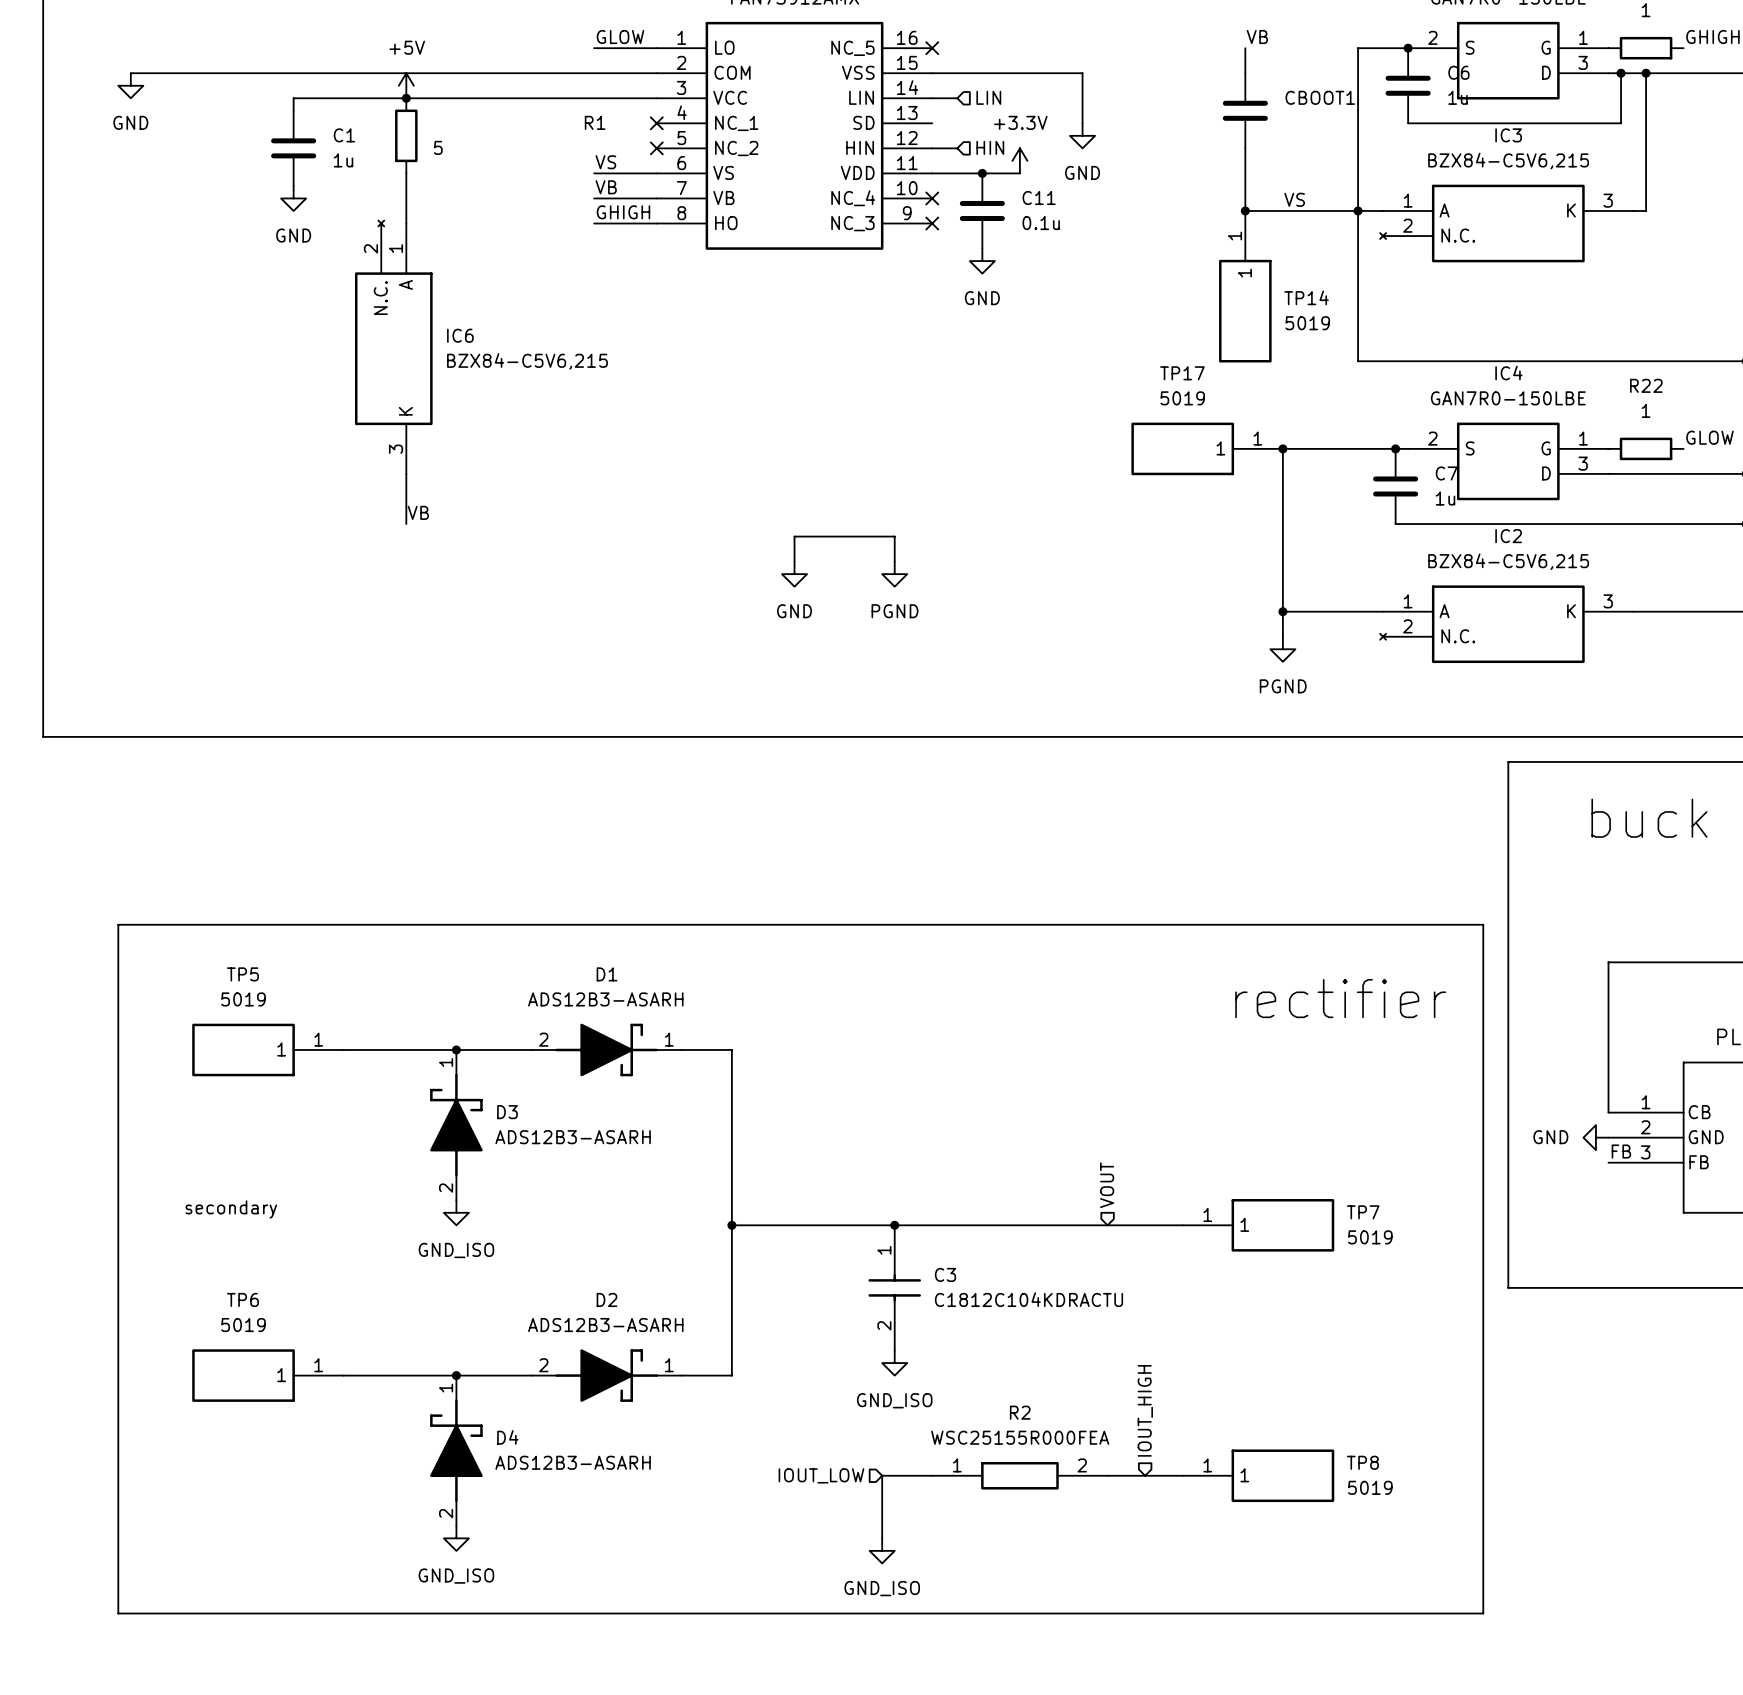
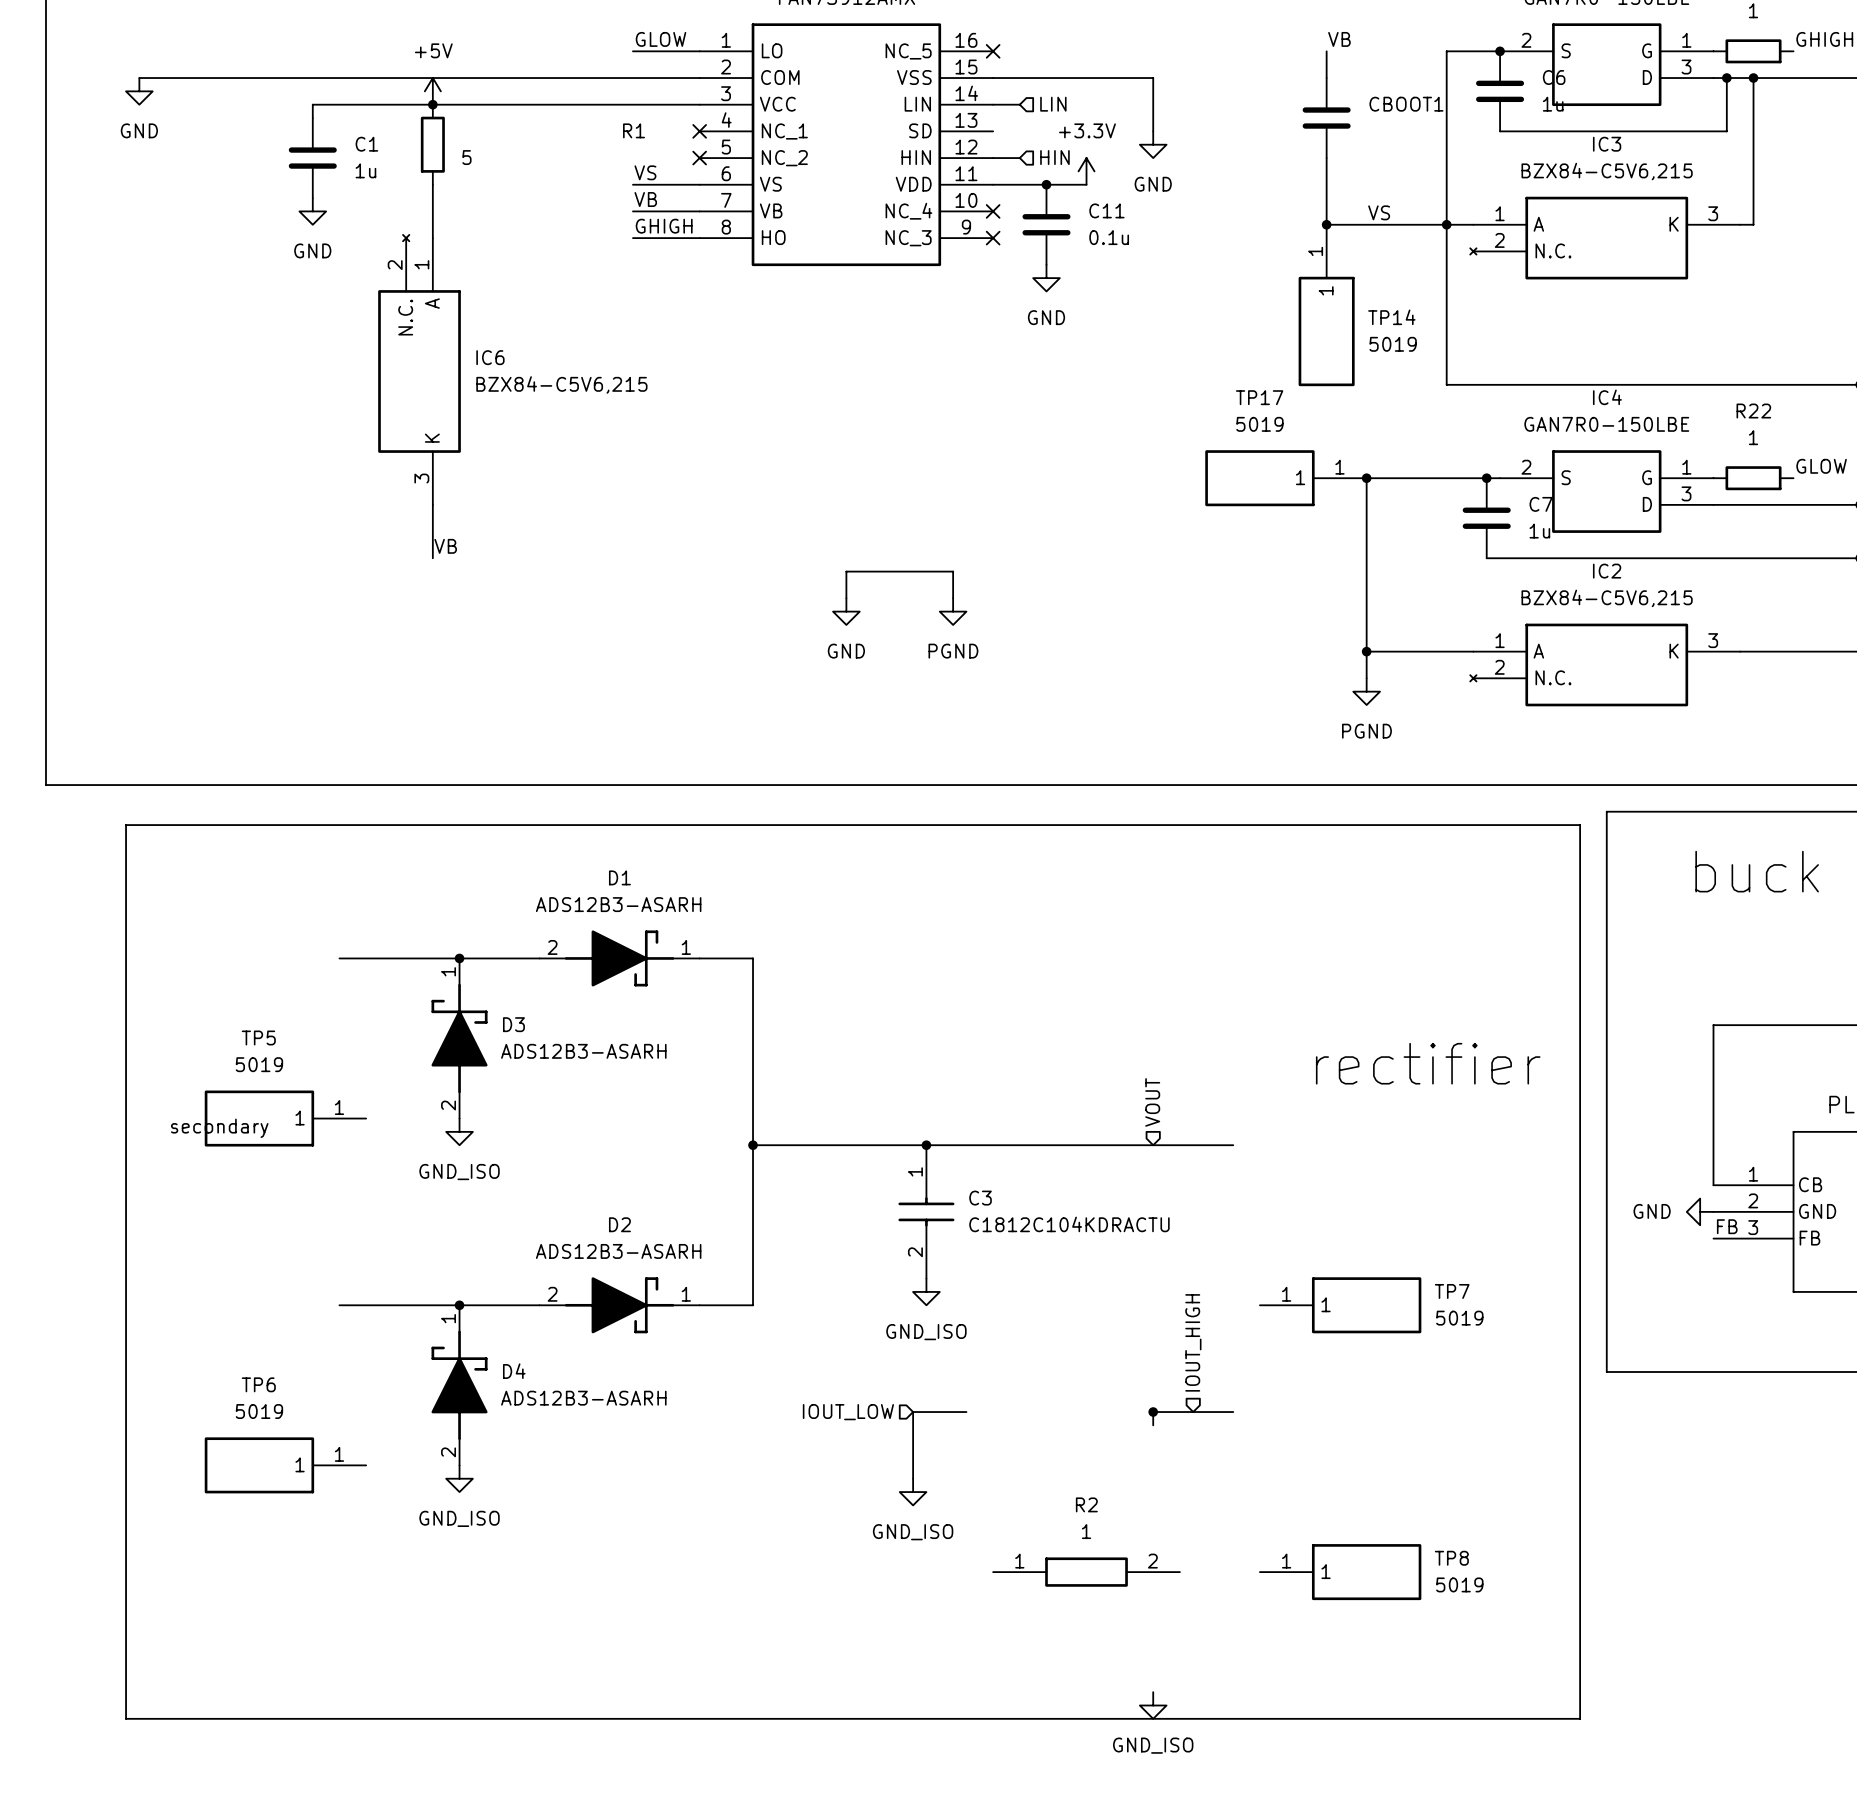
junction: none -> (459, 958)
line: (118, 924) (1483, 924) -> (126, 985) (126, 825) (1580, 825) (1580, 985)
wire: (343, 1049) (531, 1049) -> (339, 958) (539, 958)
junction: (456, 1049) -> none
D1 position: (606, 1049) -> (619, 958)
wire: (681, 1049) (731, 1049) (731, 1375) (681, 1375) -> (699, 958) (753, 958) (753, 1305) (699, 1305)
power symbol: none -> GND_ISO (459, 1131)
junction: none -> (753, 1145)
junction: none -> (926, 1145)
D3 position: (456, 1125) -> (459, 1038)
hierarchical label position: VOUT (1107, 1185) -> VOUT (1152, 1102)
text position: secondary (231, 1209) -> secondary (219, 1128)
power symbol: GND_ISO (456, 1212) -> none
power symbol: none -> GND_ISO (926, 1291)
junction: none -> (459, 1305)
wire: (731, 1225) (1182, 1225) -> (753, 1145) (1233, 1145)
junction: (731, 1225) -> none
junction: (894, 1225) -> none
C3 position: (894, 1287) -> (926, 1211)
junction: none -> (1153, 1412)
wire: none -> (1233, 1412) (1153, 1412) (1153, 1425)
power symbol position: GND_ISO (894, 1363) -> GND_ISO (913, 1492)
wire: (343, 1375) (531, 1375) -> (339, 1305) (539, 1305)
junction: (456, 1375) -> none
D2 position: (606, 1375) -> (619, 1305)
power symbol: none -> GND_ISO (459, 1478)
hierarchical label position: IOUT_HIGH (1145, 1410) -> IOUT_HIGH (1193, 1342)
R2 value: WSC25155R000FEA (1020, 1437) -> 1 (1086, 1531)
D4 position: (456, 1450) -> (459, 1385)
hierarchical label position: IOUT_LOW (821, 1475) -> IOUT_LOW (848, 1412)
wire: (932, 1475) (882, 1475) (882, 1538) -> (966, 1412) (913, 1412) (913, 1478)
wire: (1107, 1475) (1182, 1475) -> none
power symbol: GND_ISO (456, 1538) -> none
power symbol: GND_ISO (882, 1550) -> none
power symbol: none -> GND_ISO (1153, 1705)

